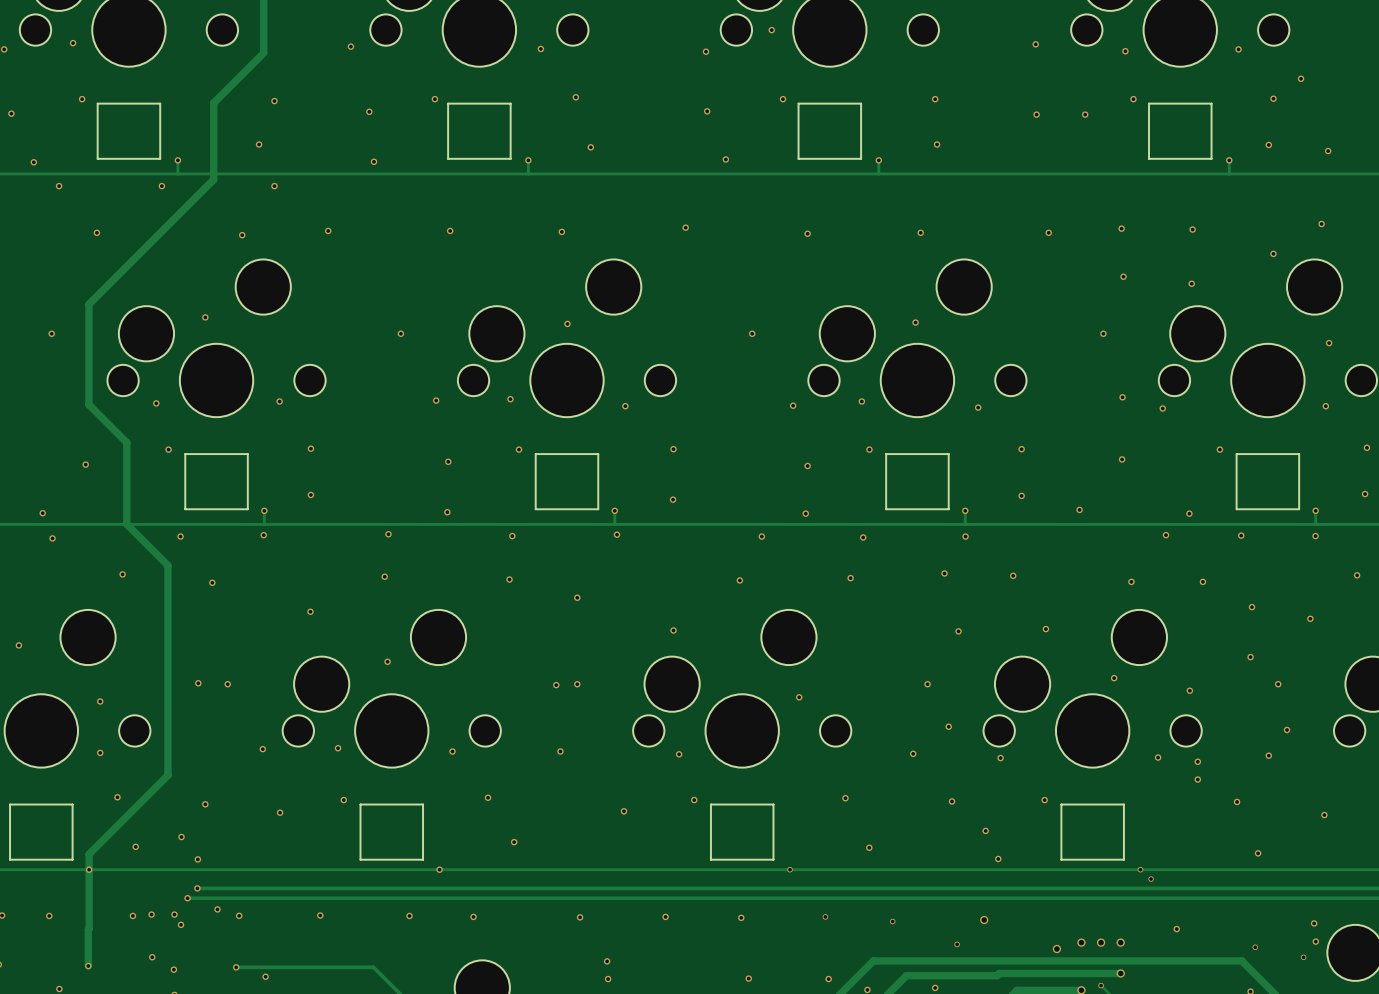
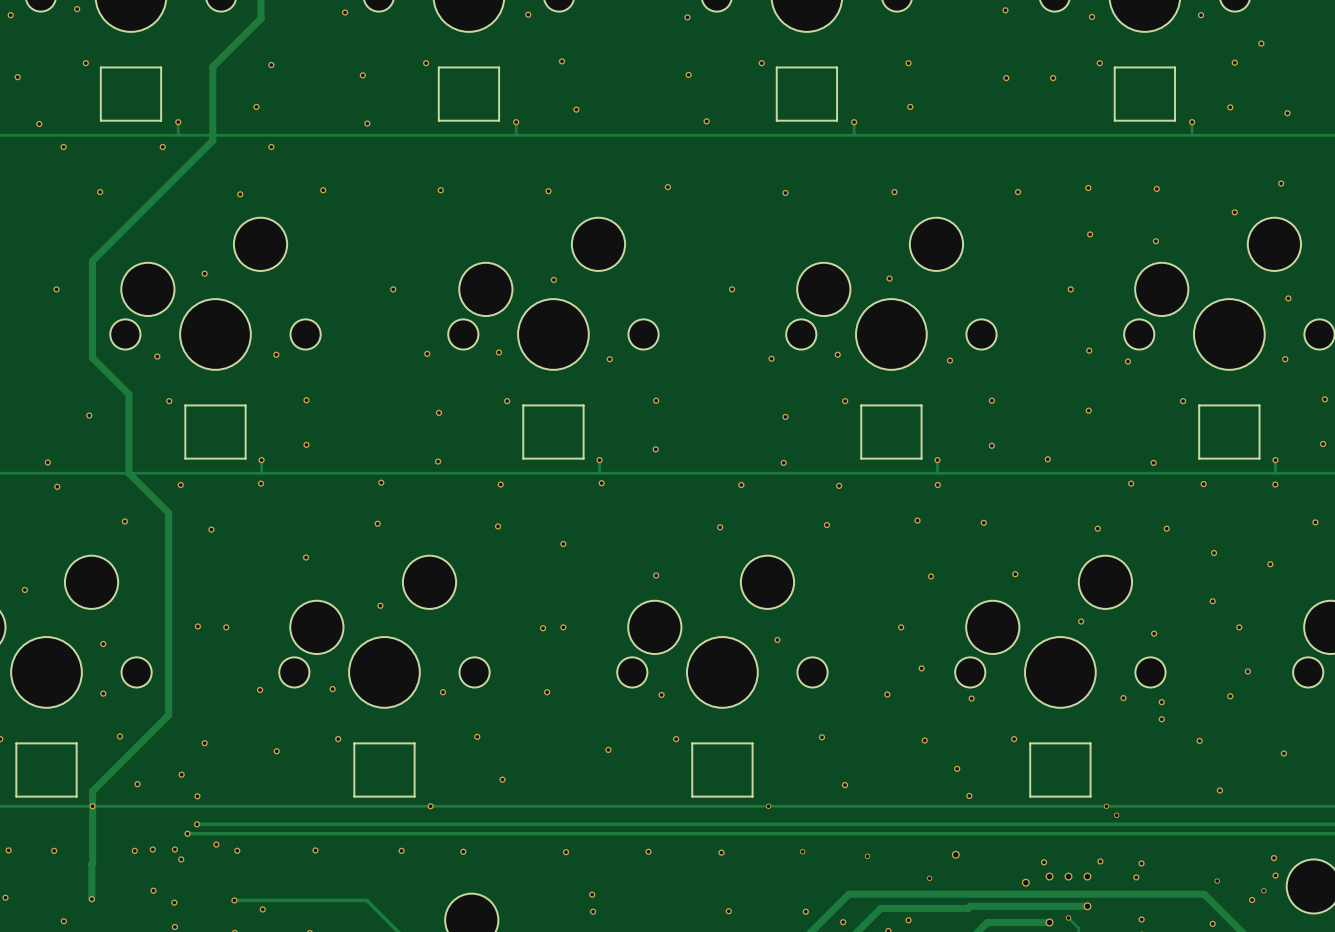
via: none -> (1100, 861)
via: none -> (1044, 862)
via: none -> (1136, 877)
via: none -> (1252, 900)
via: none -> (1141, 919)

